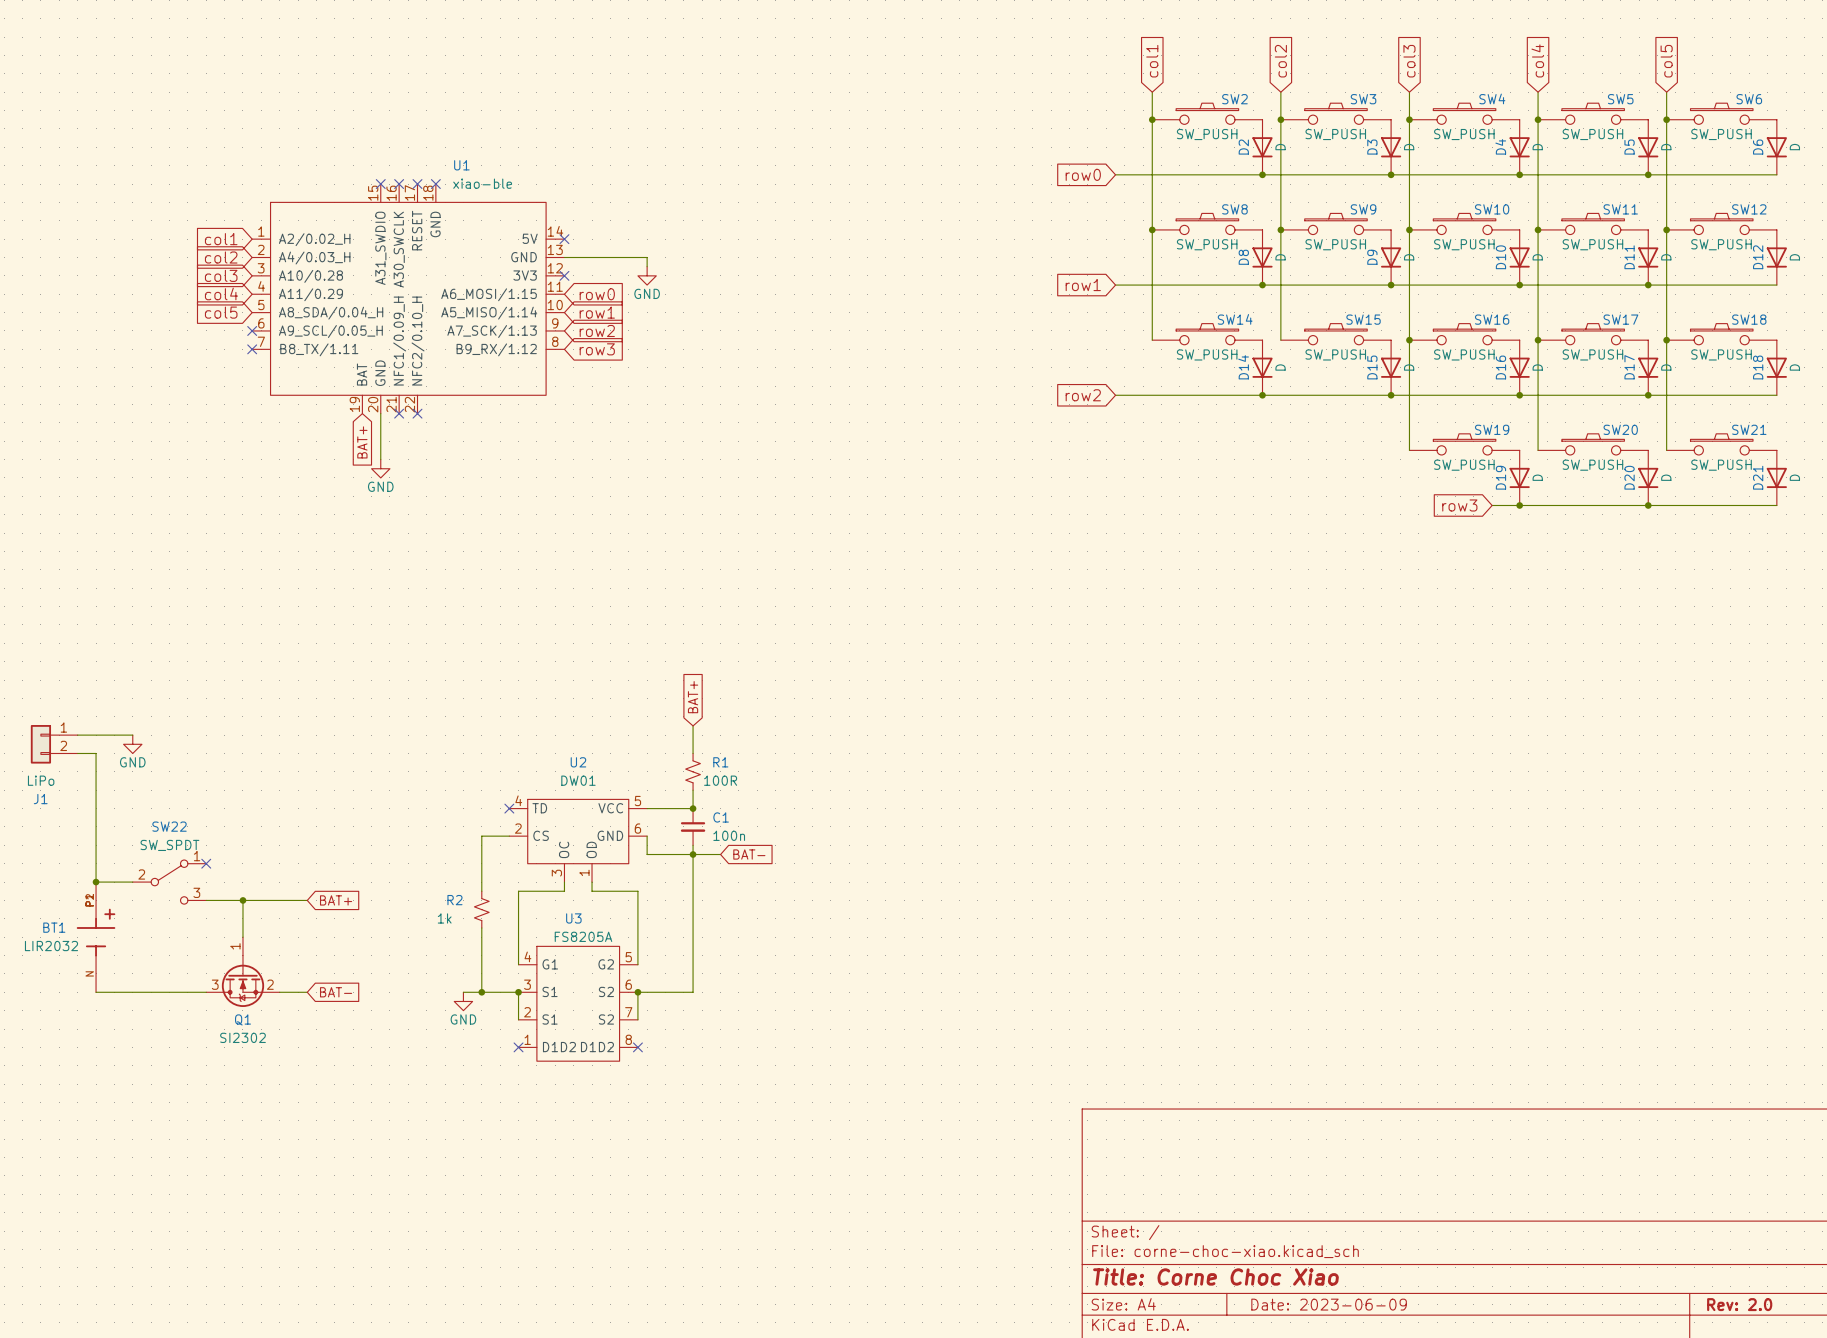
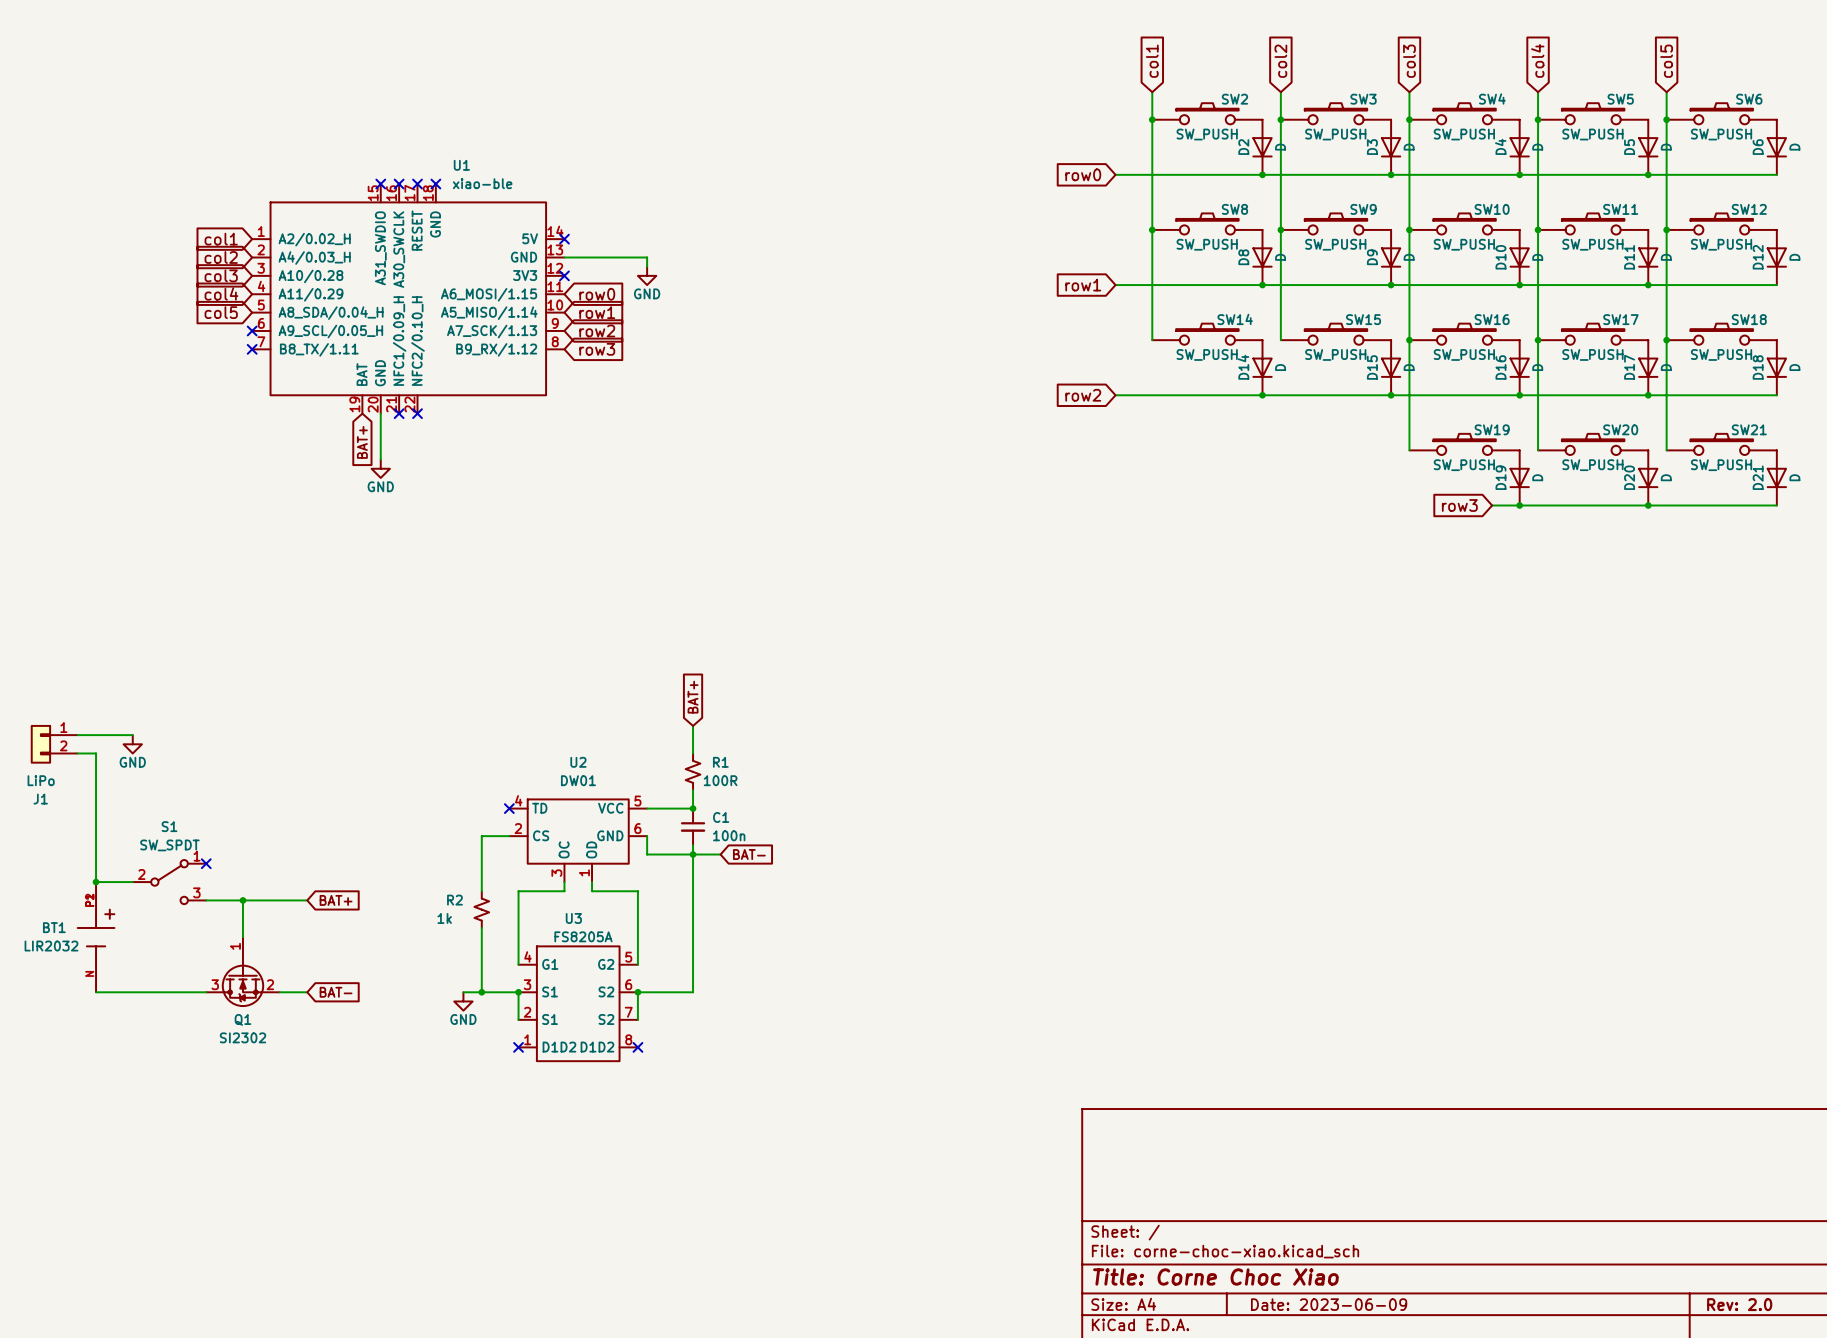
SW22 name: SW22 (169, 826) -> S1 (169, 826)

